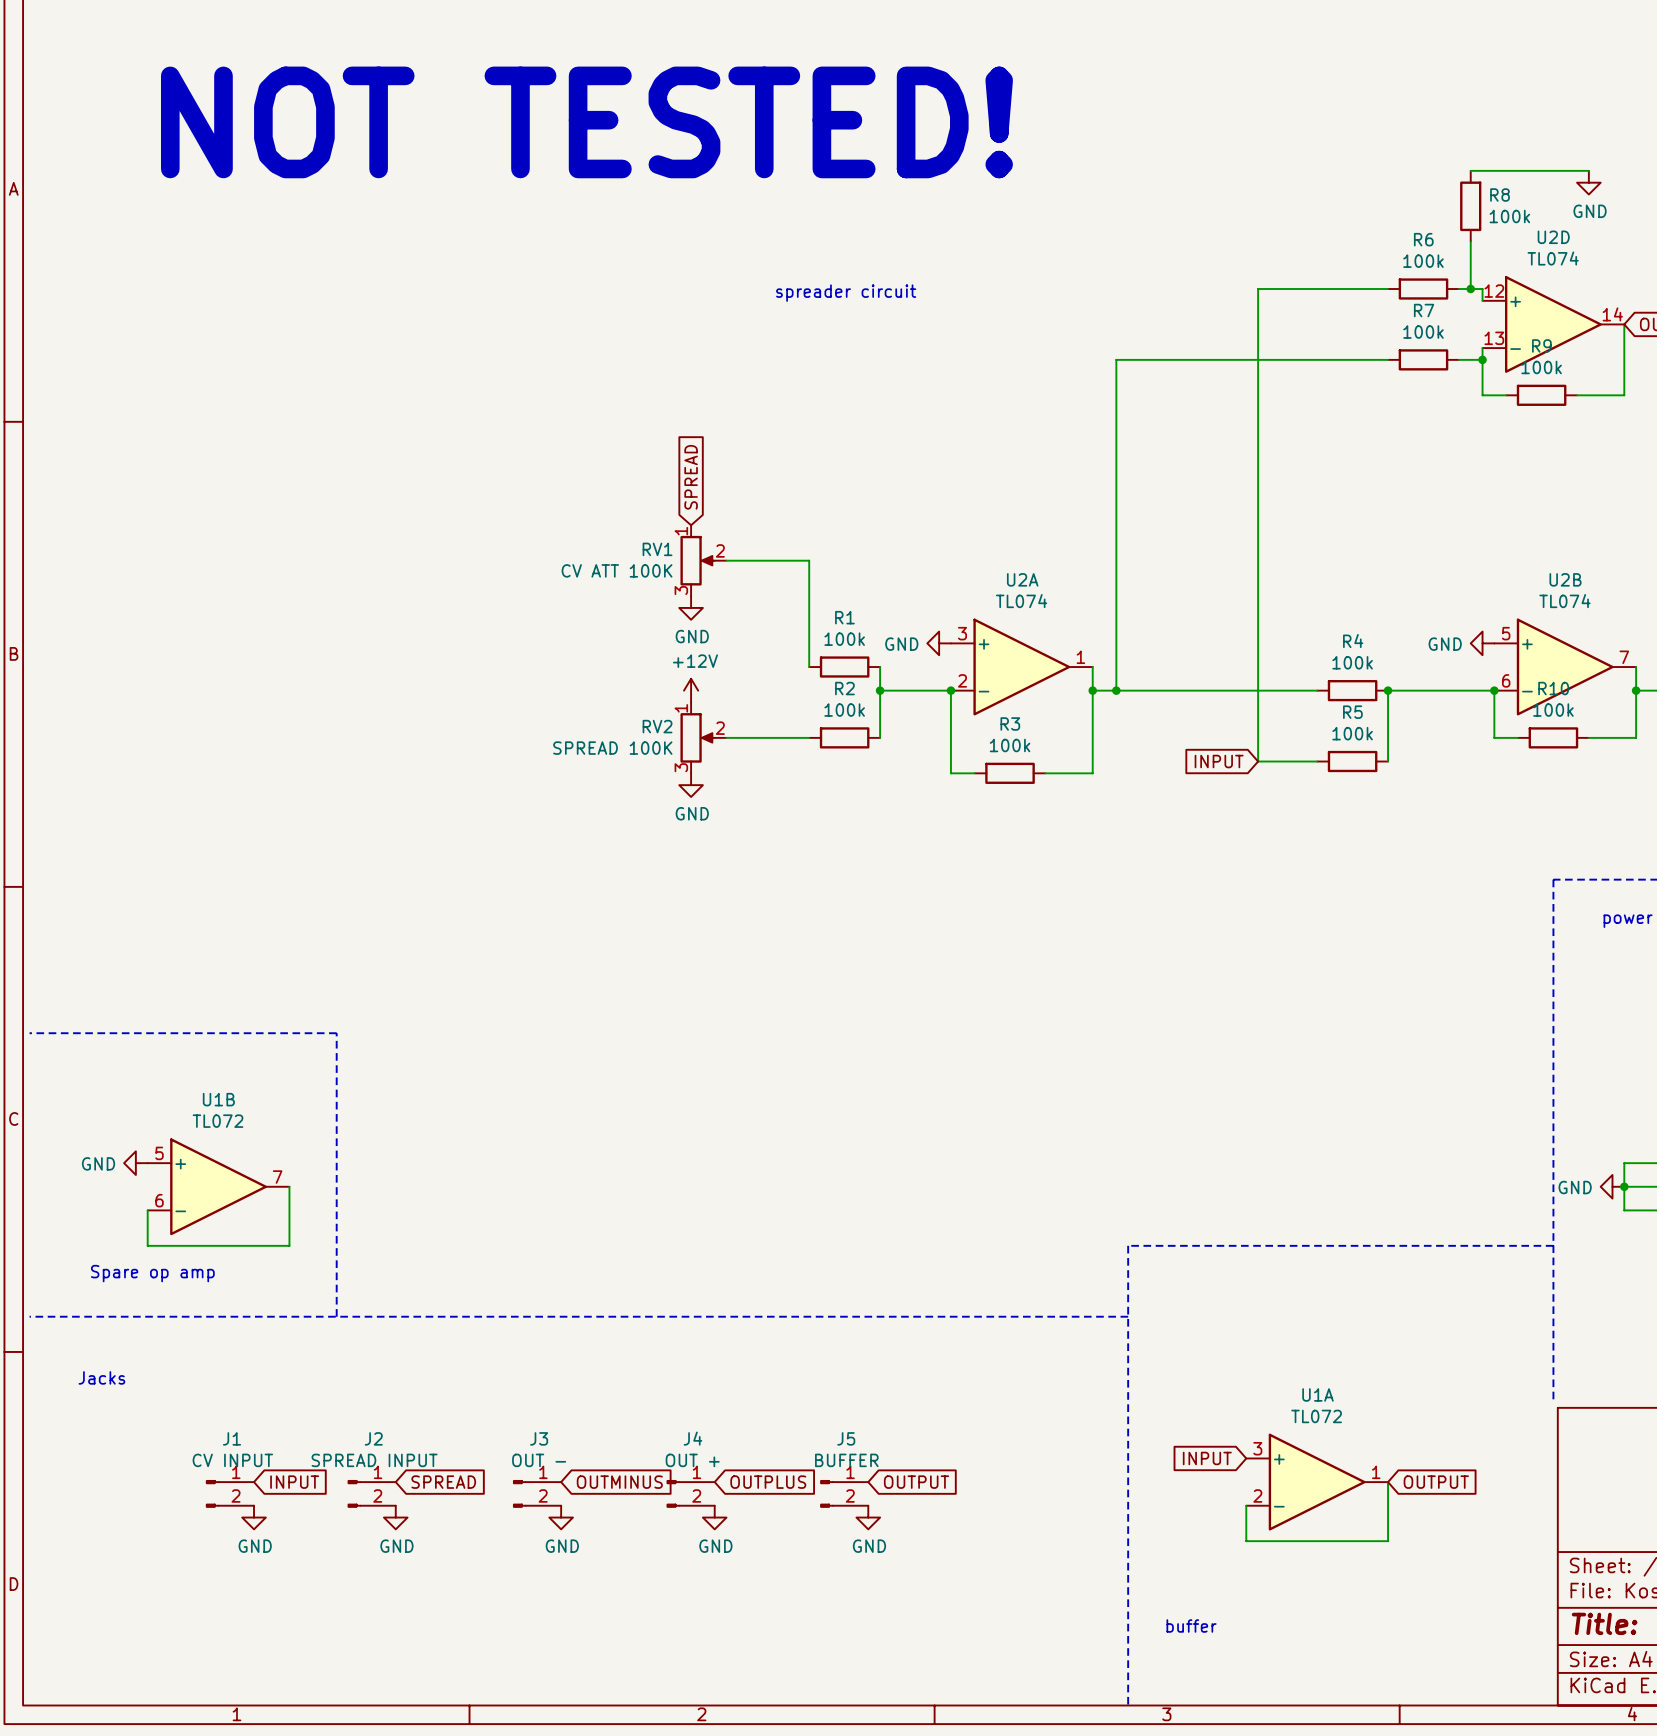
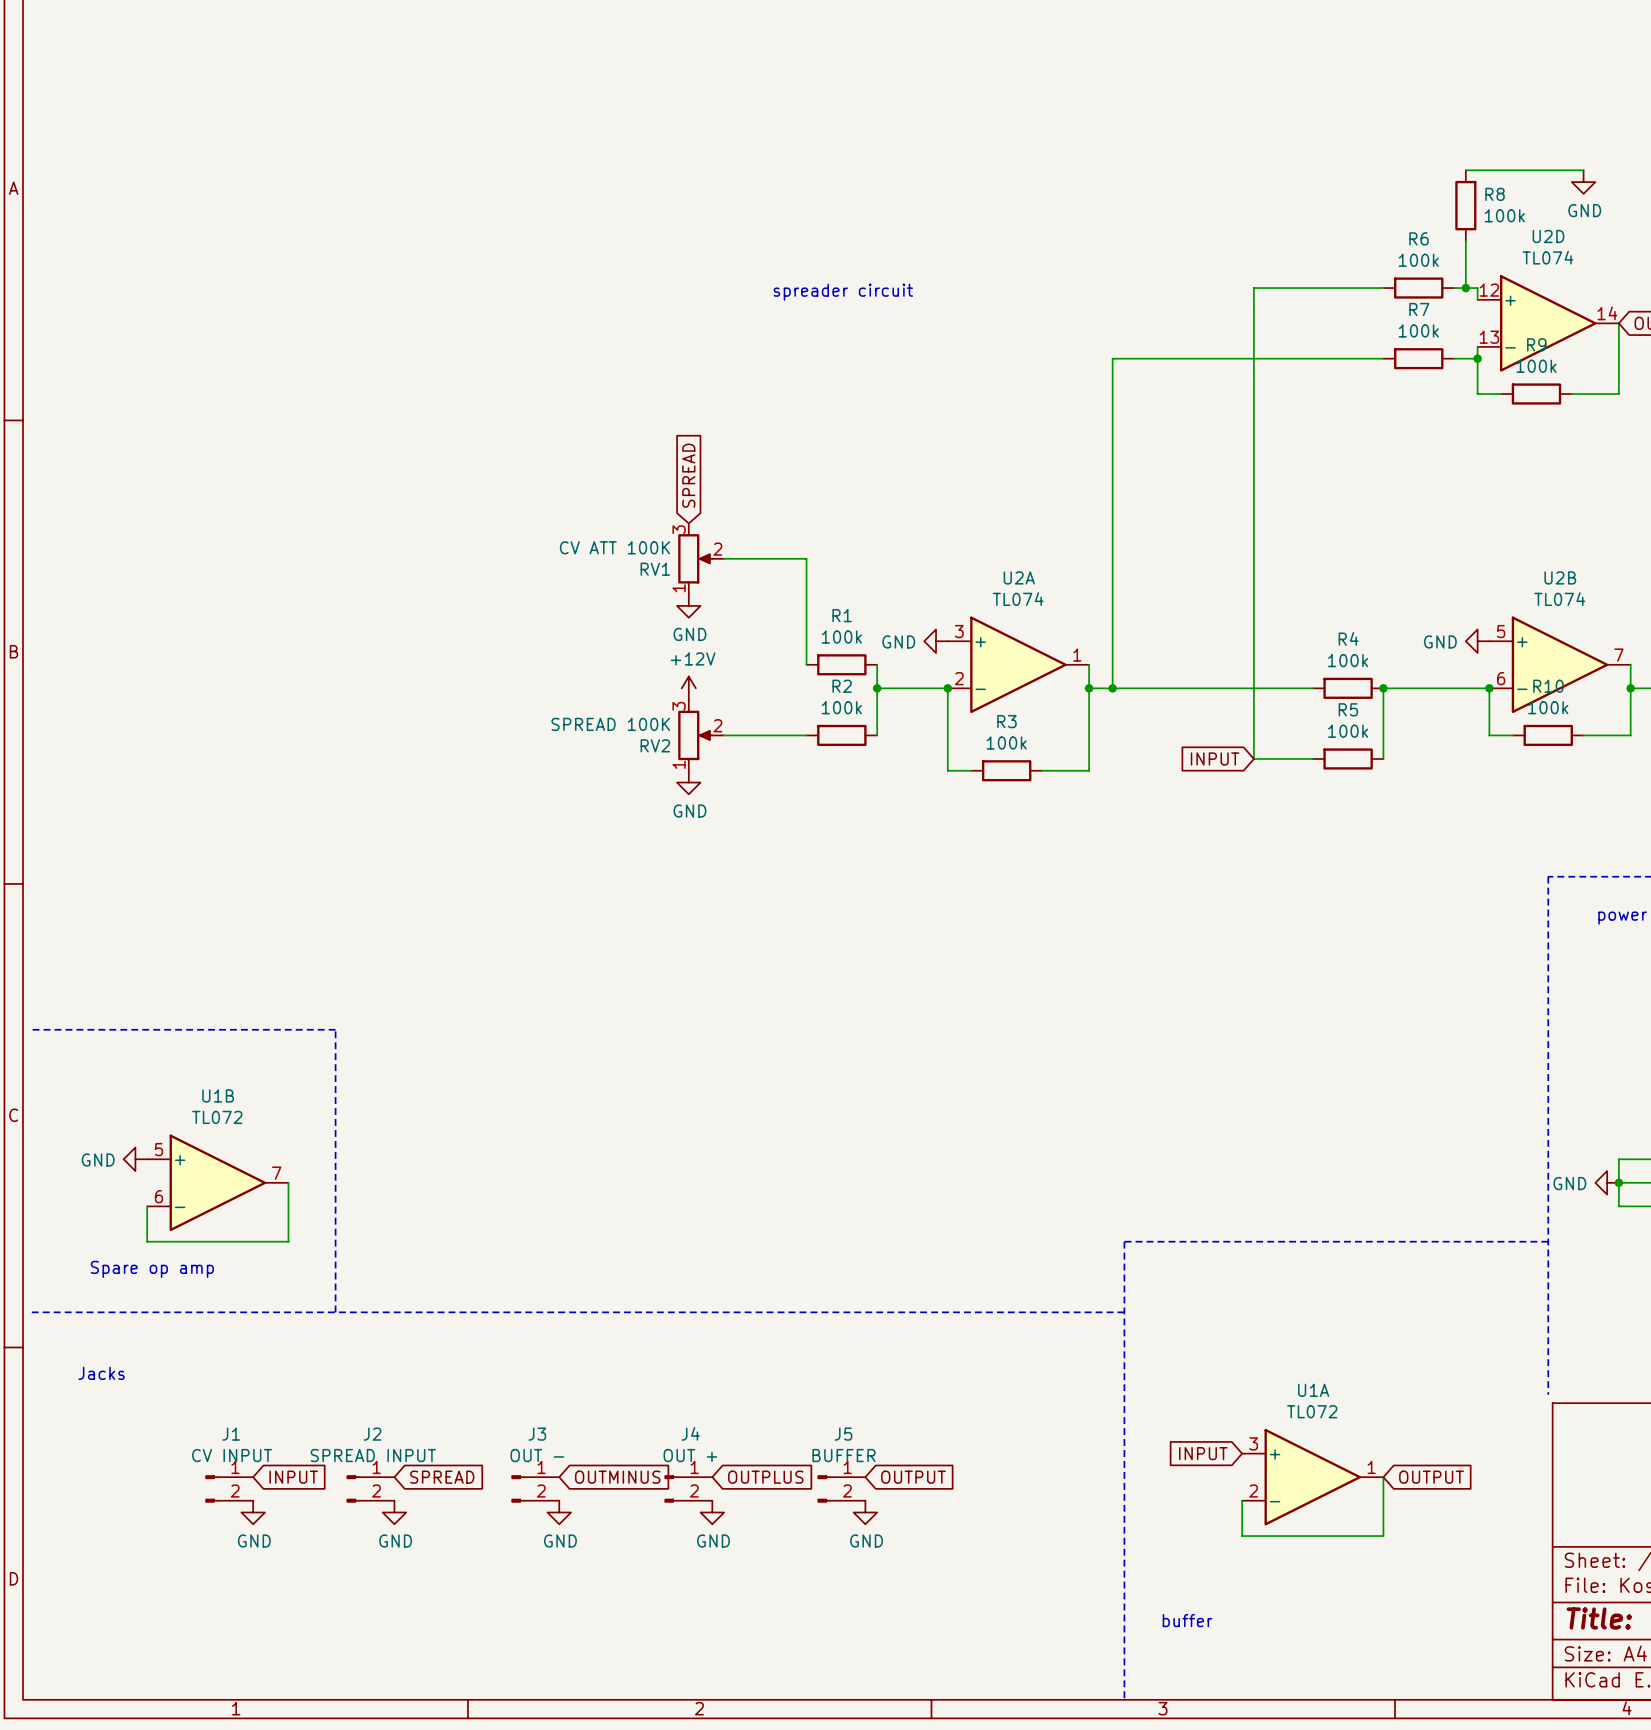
text: NOT TESTED! (586, 122) -> none
RV1 flip: as is (697, 560) -> up-down (695, 558)
RV2 flip: as is (697, 737) -> up-down (695, 735)

